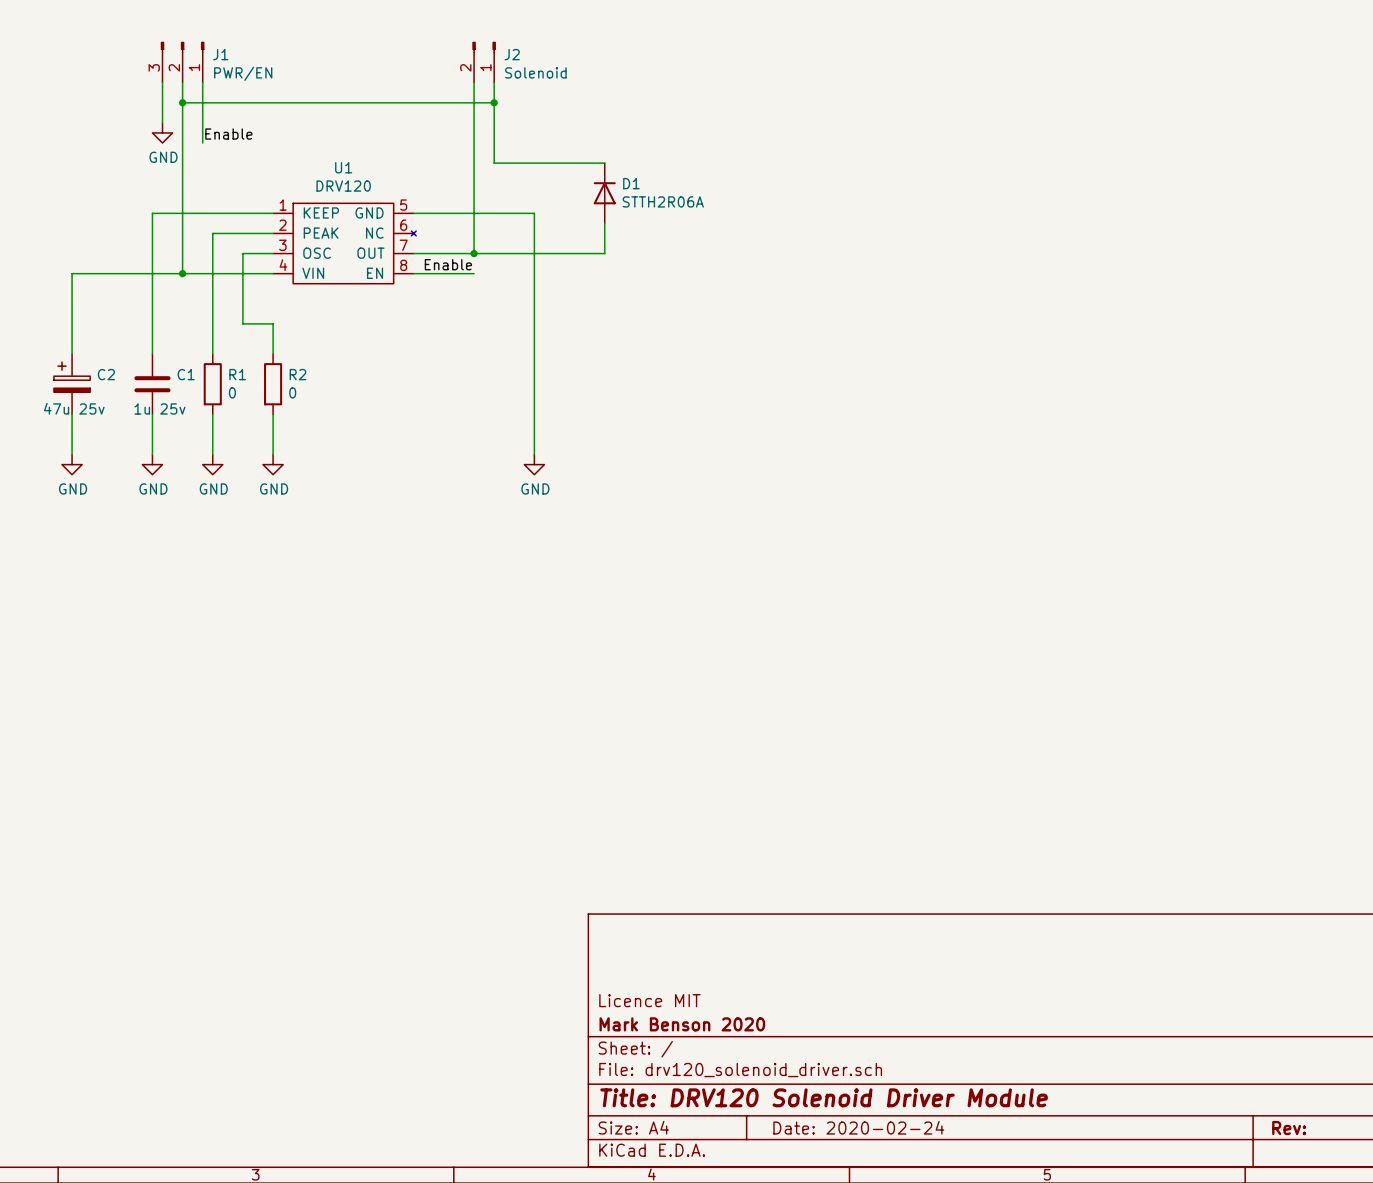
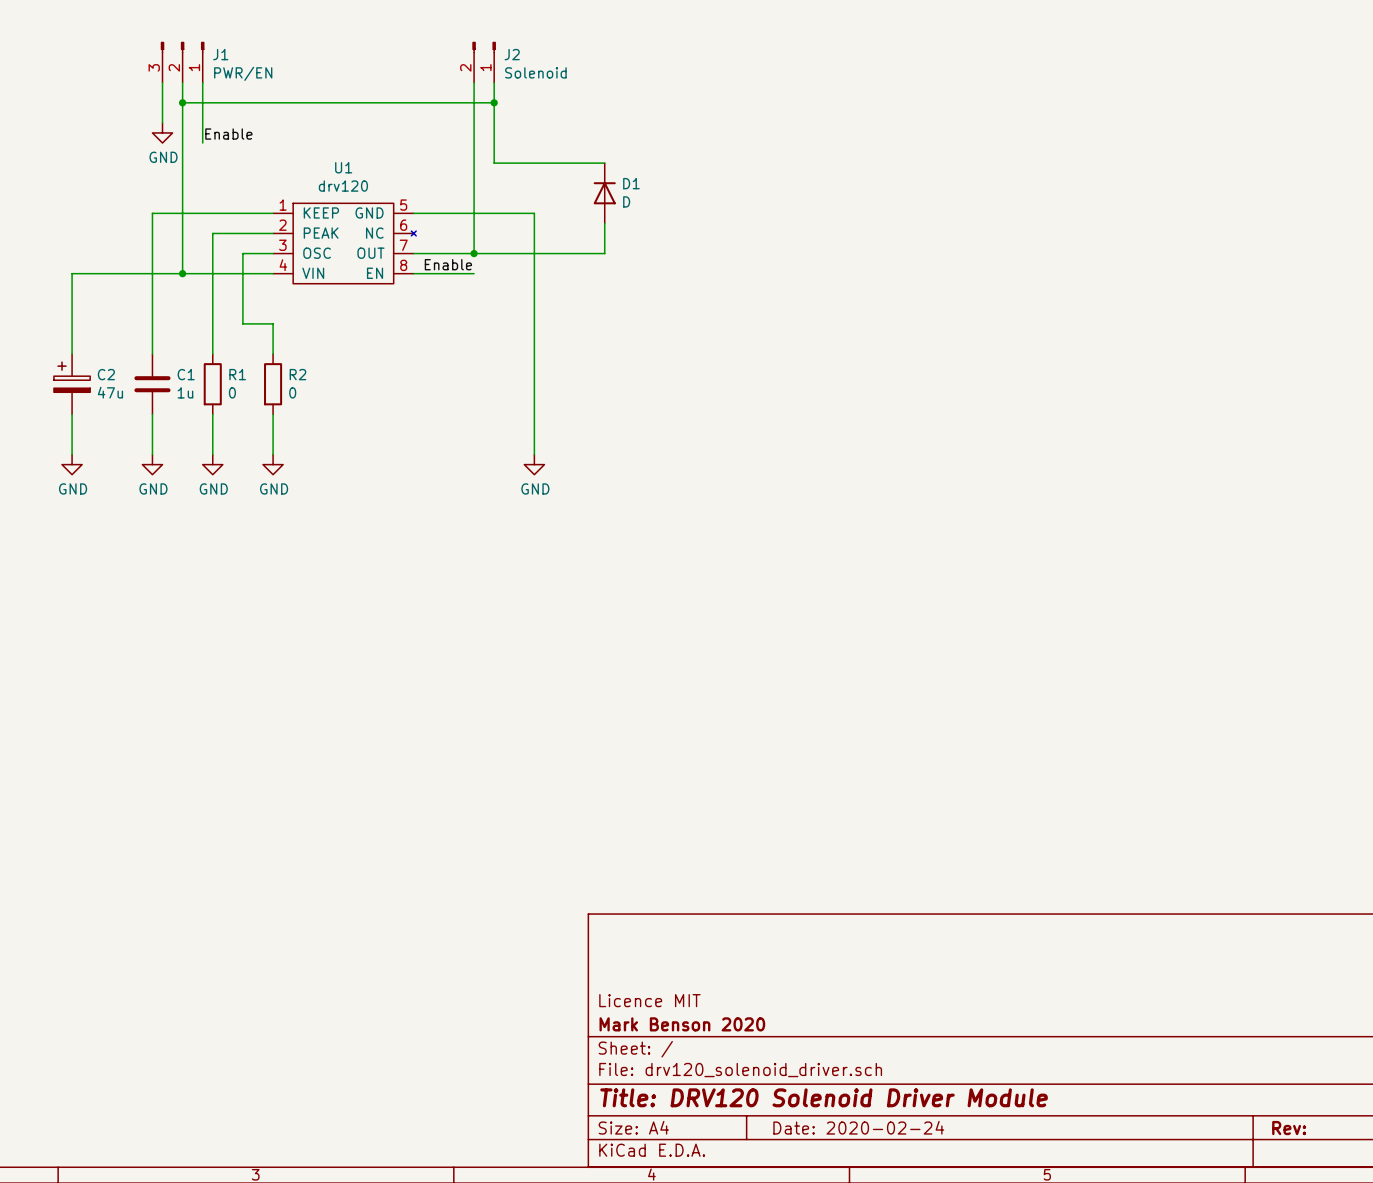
U1 value: DRV120 (343, 186) -> drv120 (343, 186)
D1 value: STTH2R06A (663, 201) -> D (626, 201)
C2 value: 47u 25v (74, 408) -> 47u (110, 392)
C1 value: 1u 25v (159, 408) -> 1u (185, 392)

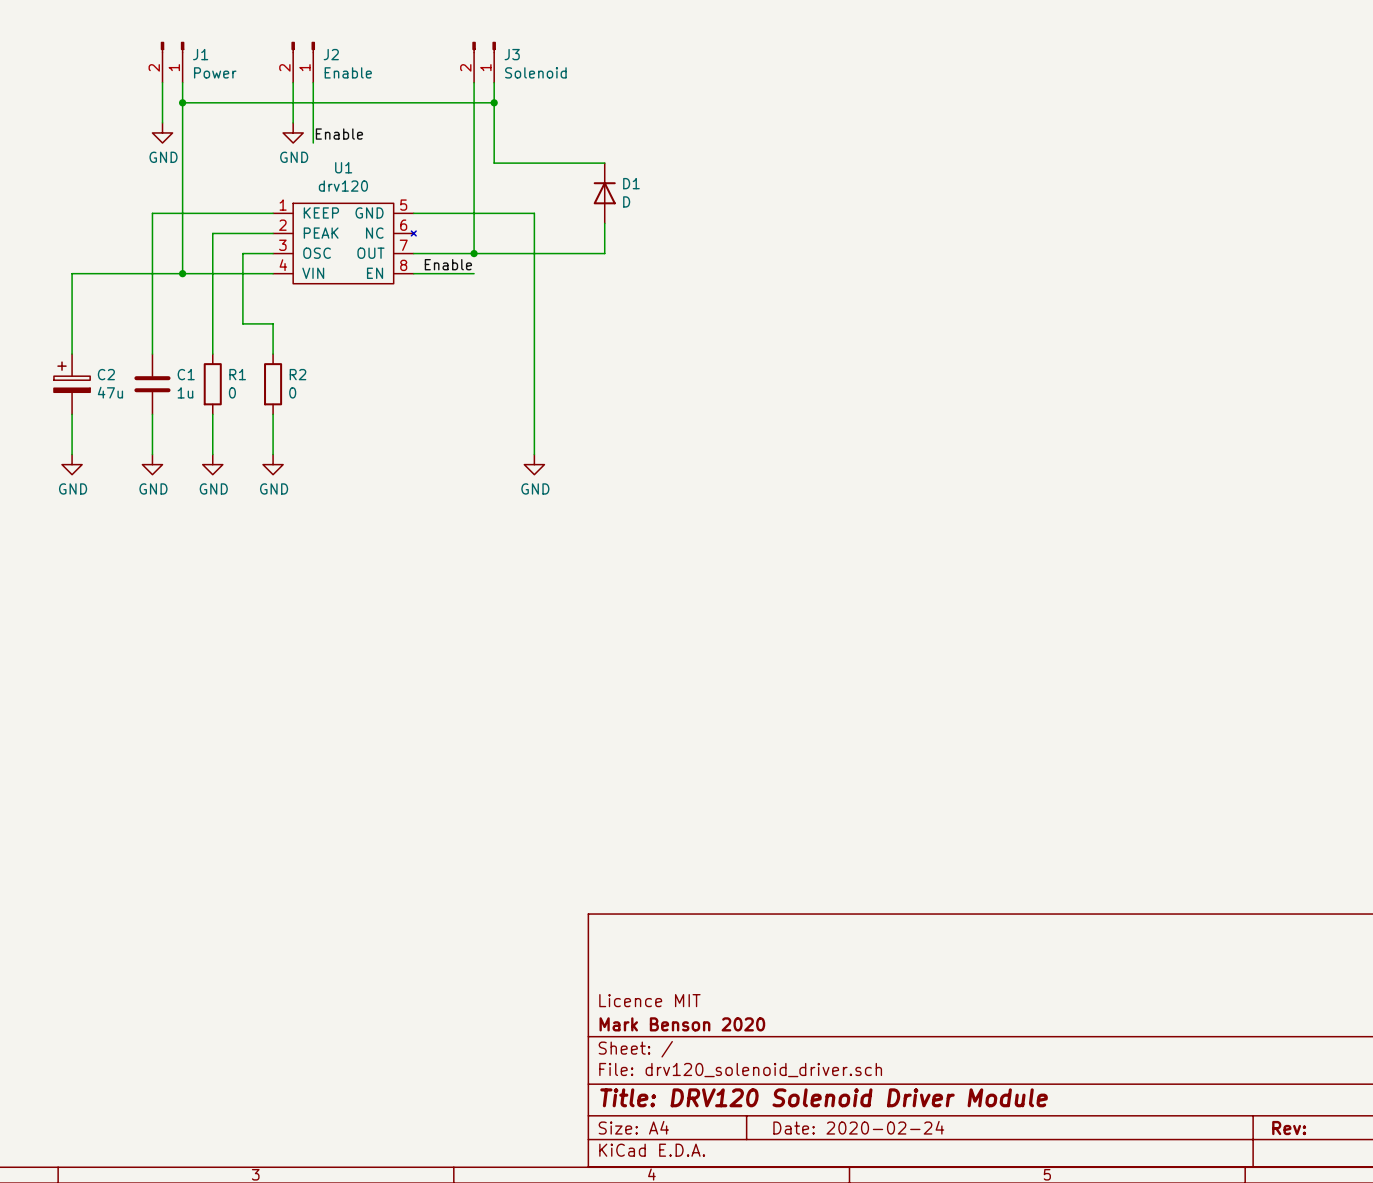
J1 symbol: [160, 41, 205, 83] -> [160, 41, 185, 83]
J2 name: J2 (512, 54) -> J3 (512, 54)
J2: none -> Enable (303, 62)
J1 value: PWR/EN (243, 73) -> Power (215, 72)
wire: (202, 82) (202, 143) -> (313, 82) (313, 143)
wire: none -> (293, 82) (293, 122)
power symbol: none -> GND (293, 132)
label position: Enable (228, 134) -> Enable (339, 134)

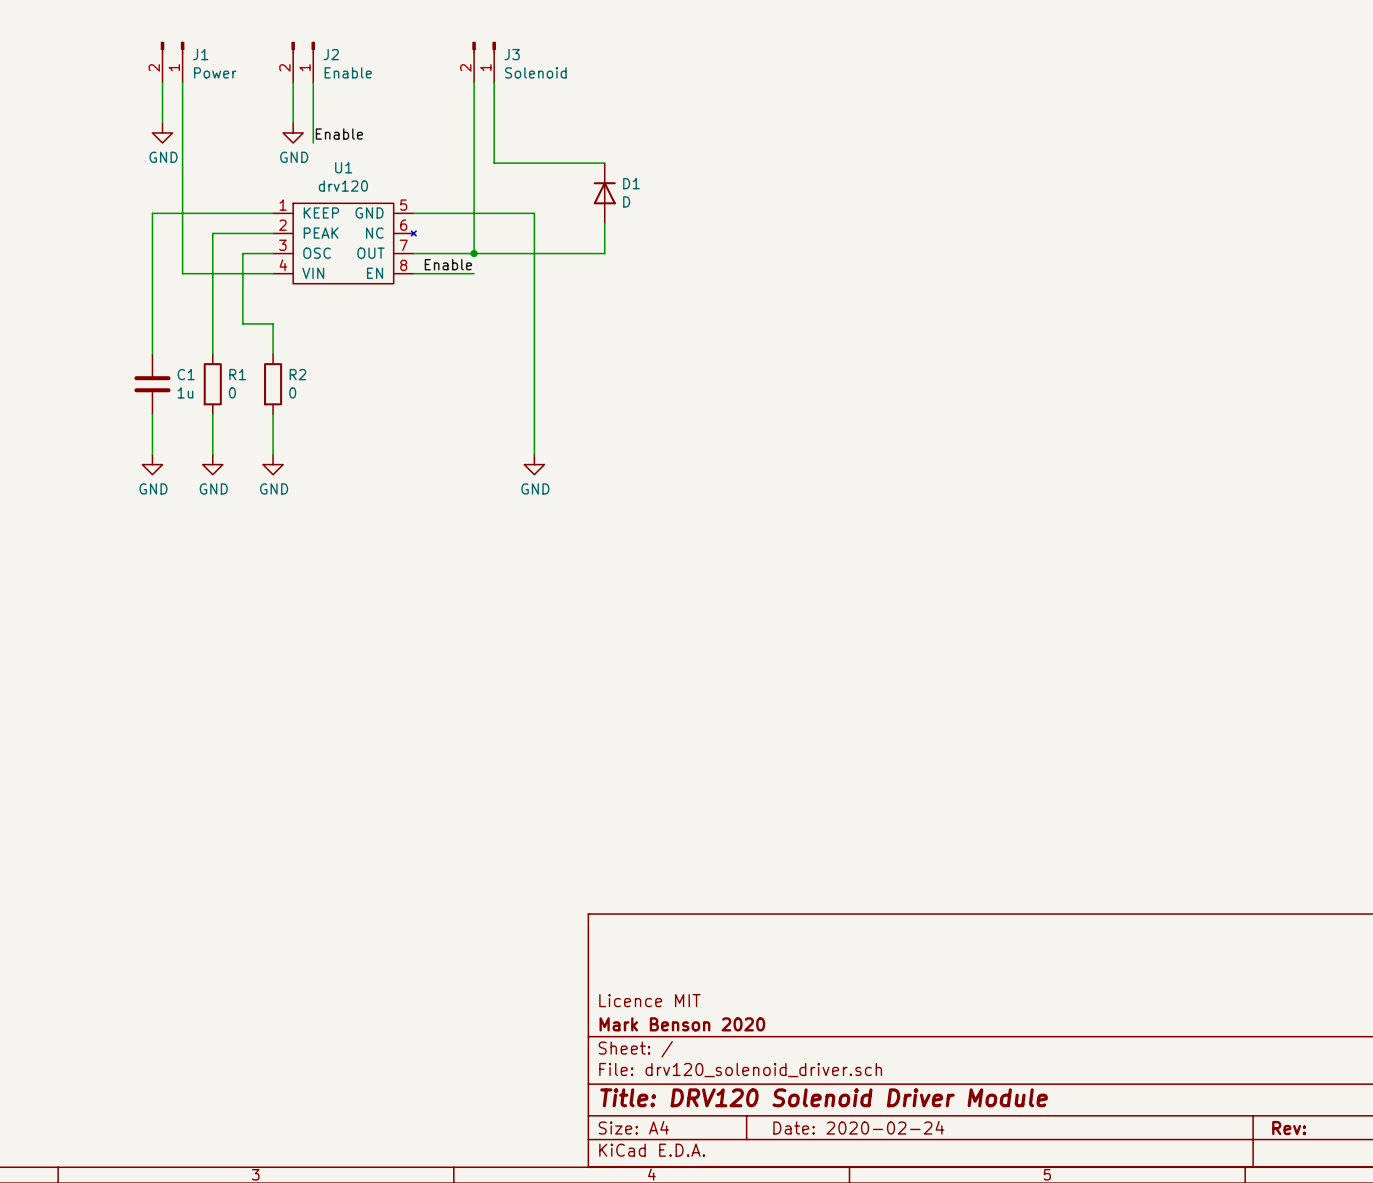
wire: (182, 102) (494, 102) -> none
junction: (182, 102) -> none
junction: (494, 102) -> none
wire: (182, 273) (72, 273) (72, 354) -> none
junction: (182, 273) -> none
C2: 47u (72, 384) -> none
wire: (72, 414) (72, 454) -> none
power symbol: GND (72, 464) -> none

